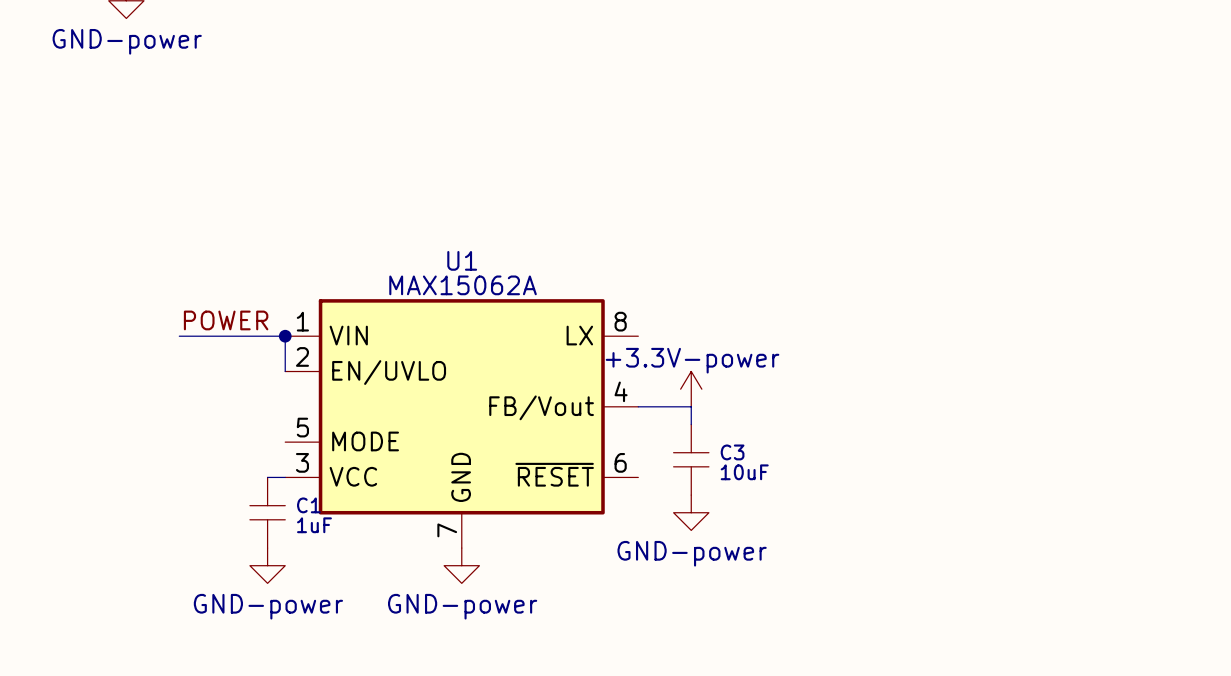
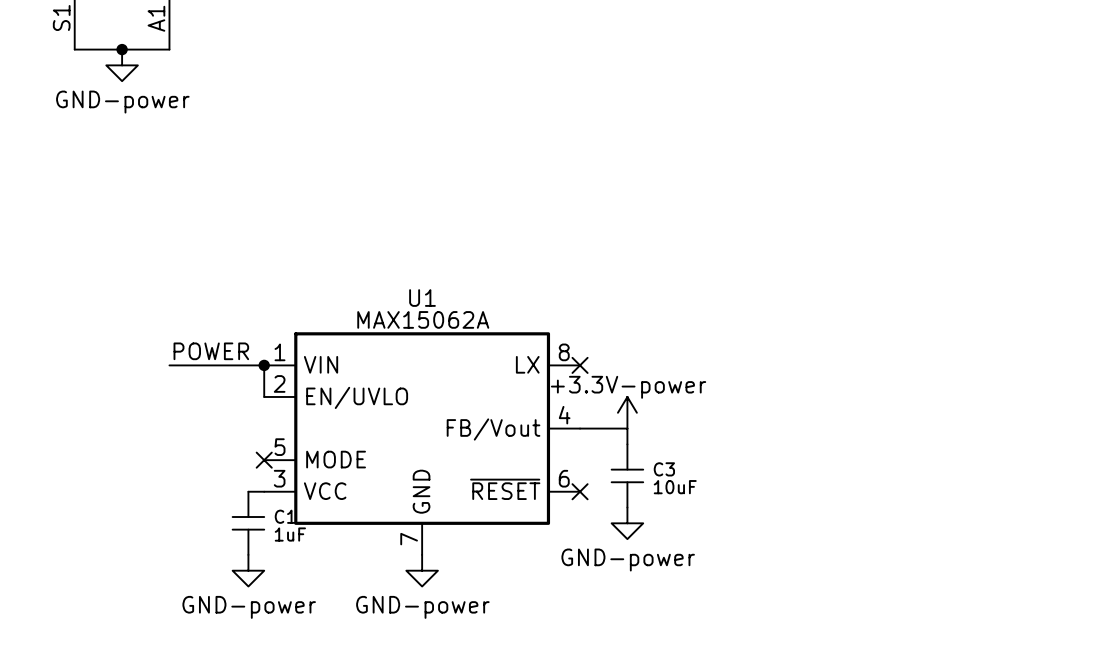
no-connect mark: none -> (580, 365)
no-connect mark: none -> (264, 460)
no-connect mark: none -> (580, 491)

